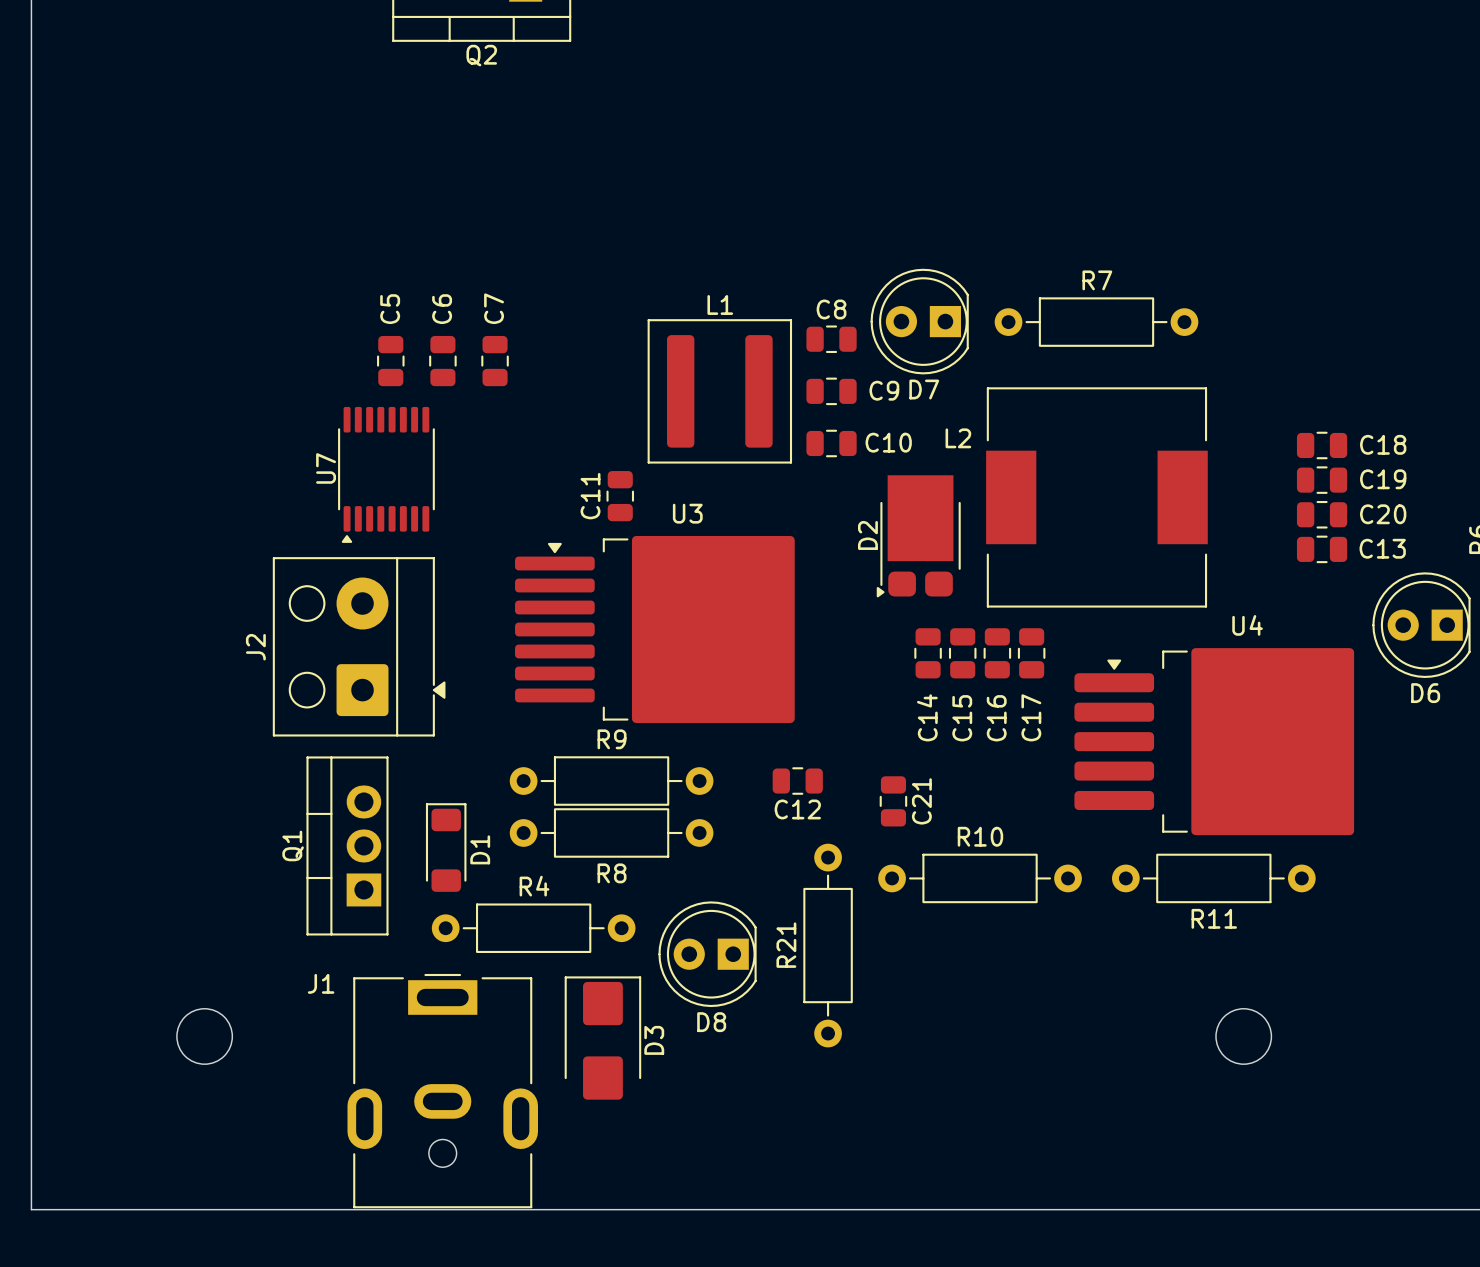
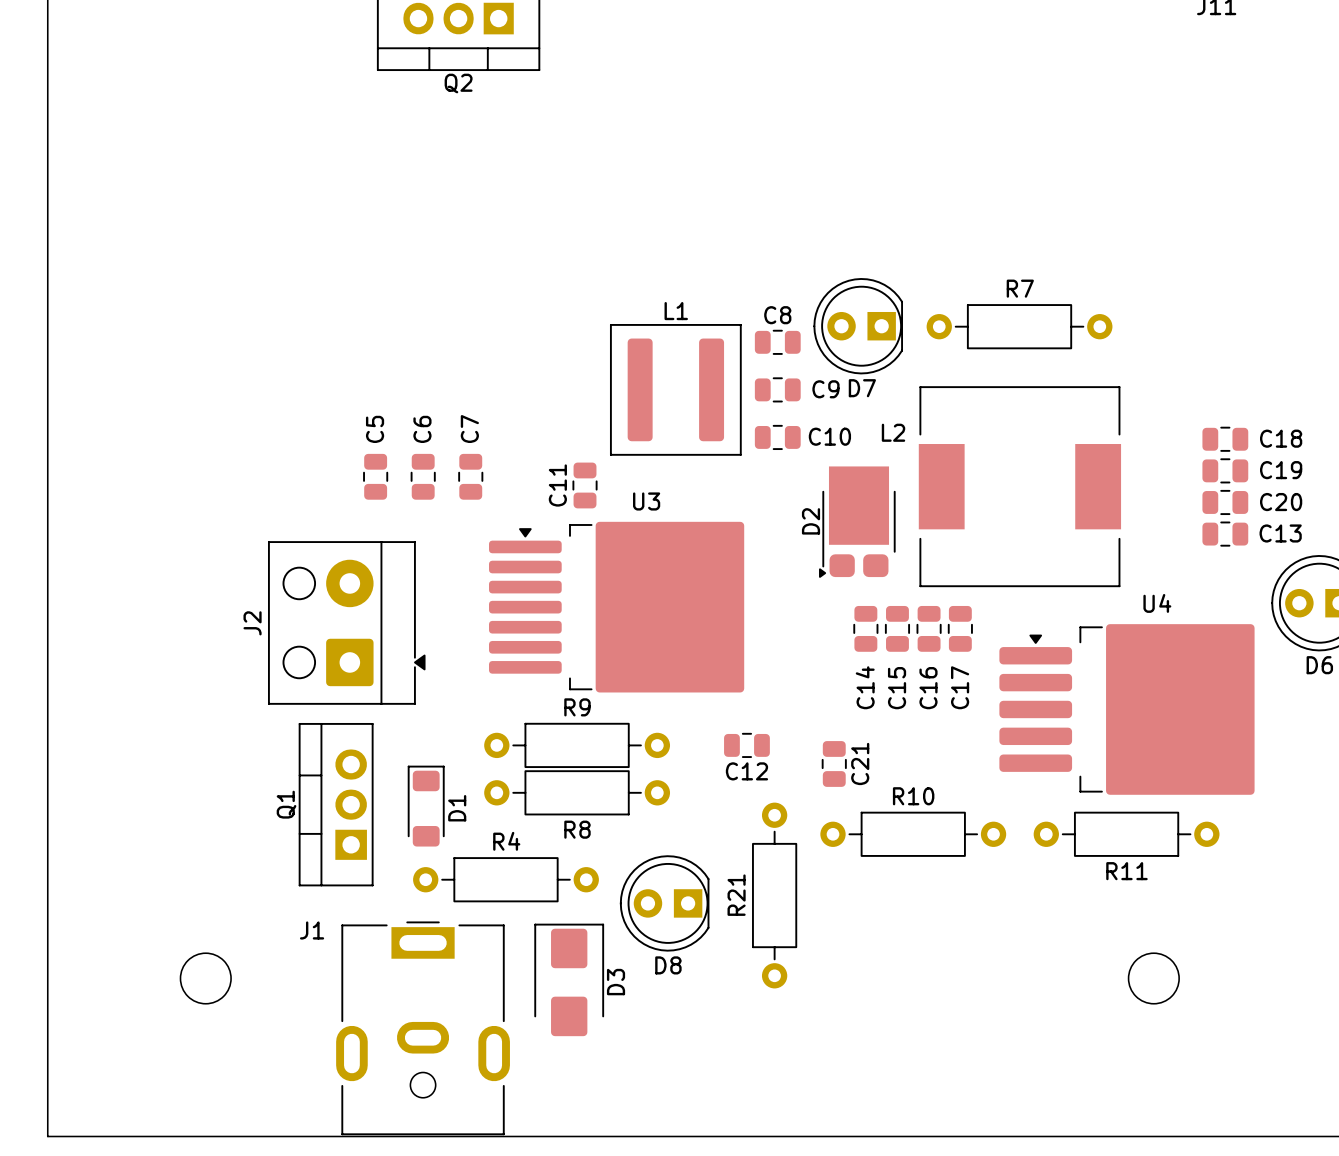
C5 position: (390, 361) -> (375, 476)
C6 position: (442, 361) -> (423, 476)
C7 position: (495, 361) -> (470, 476)
U7: (386, 474) -> none

